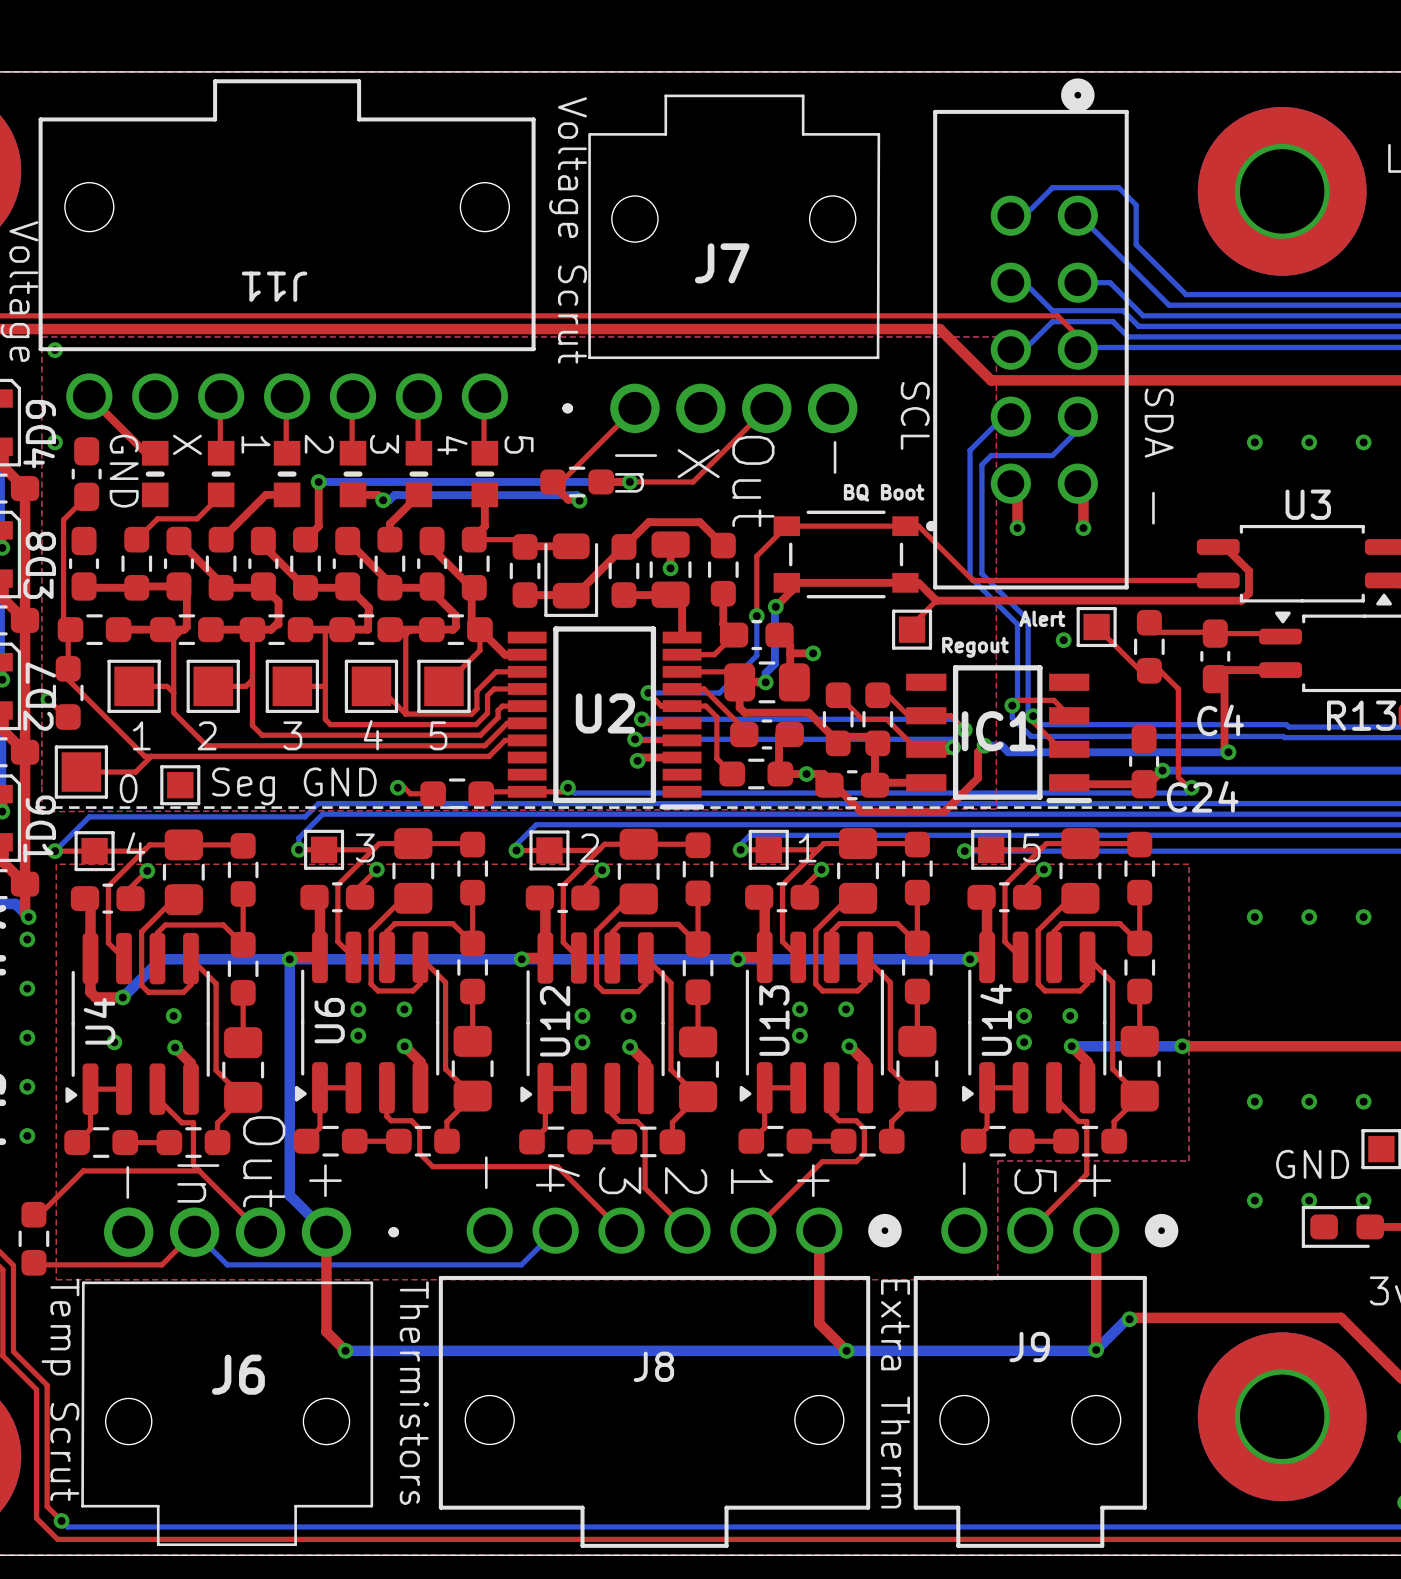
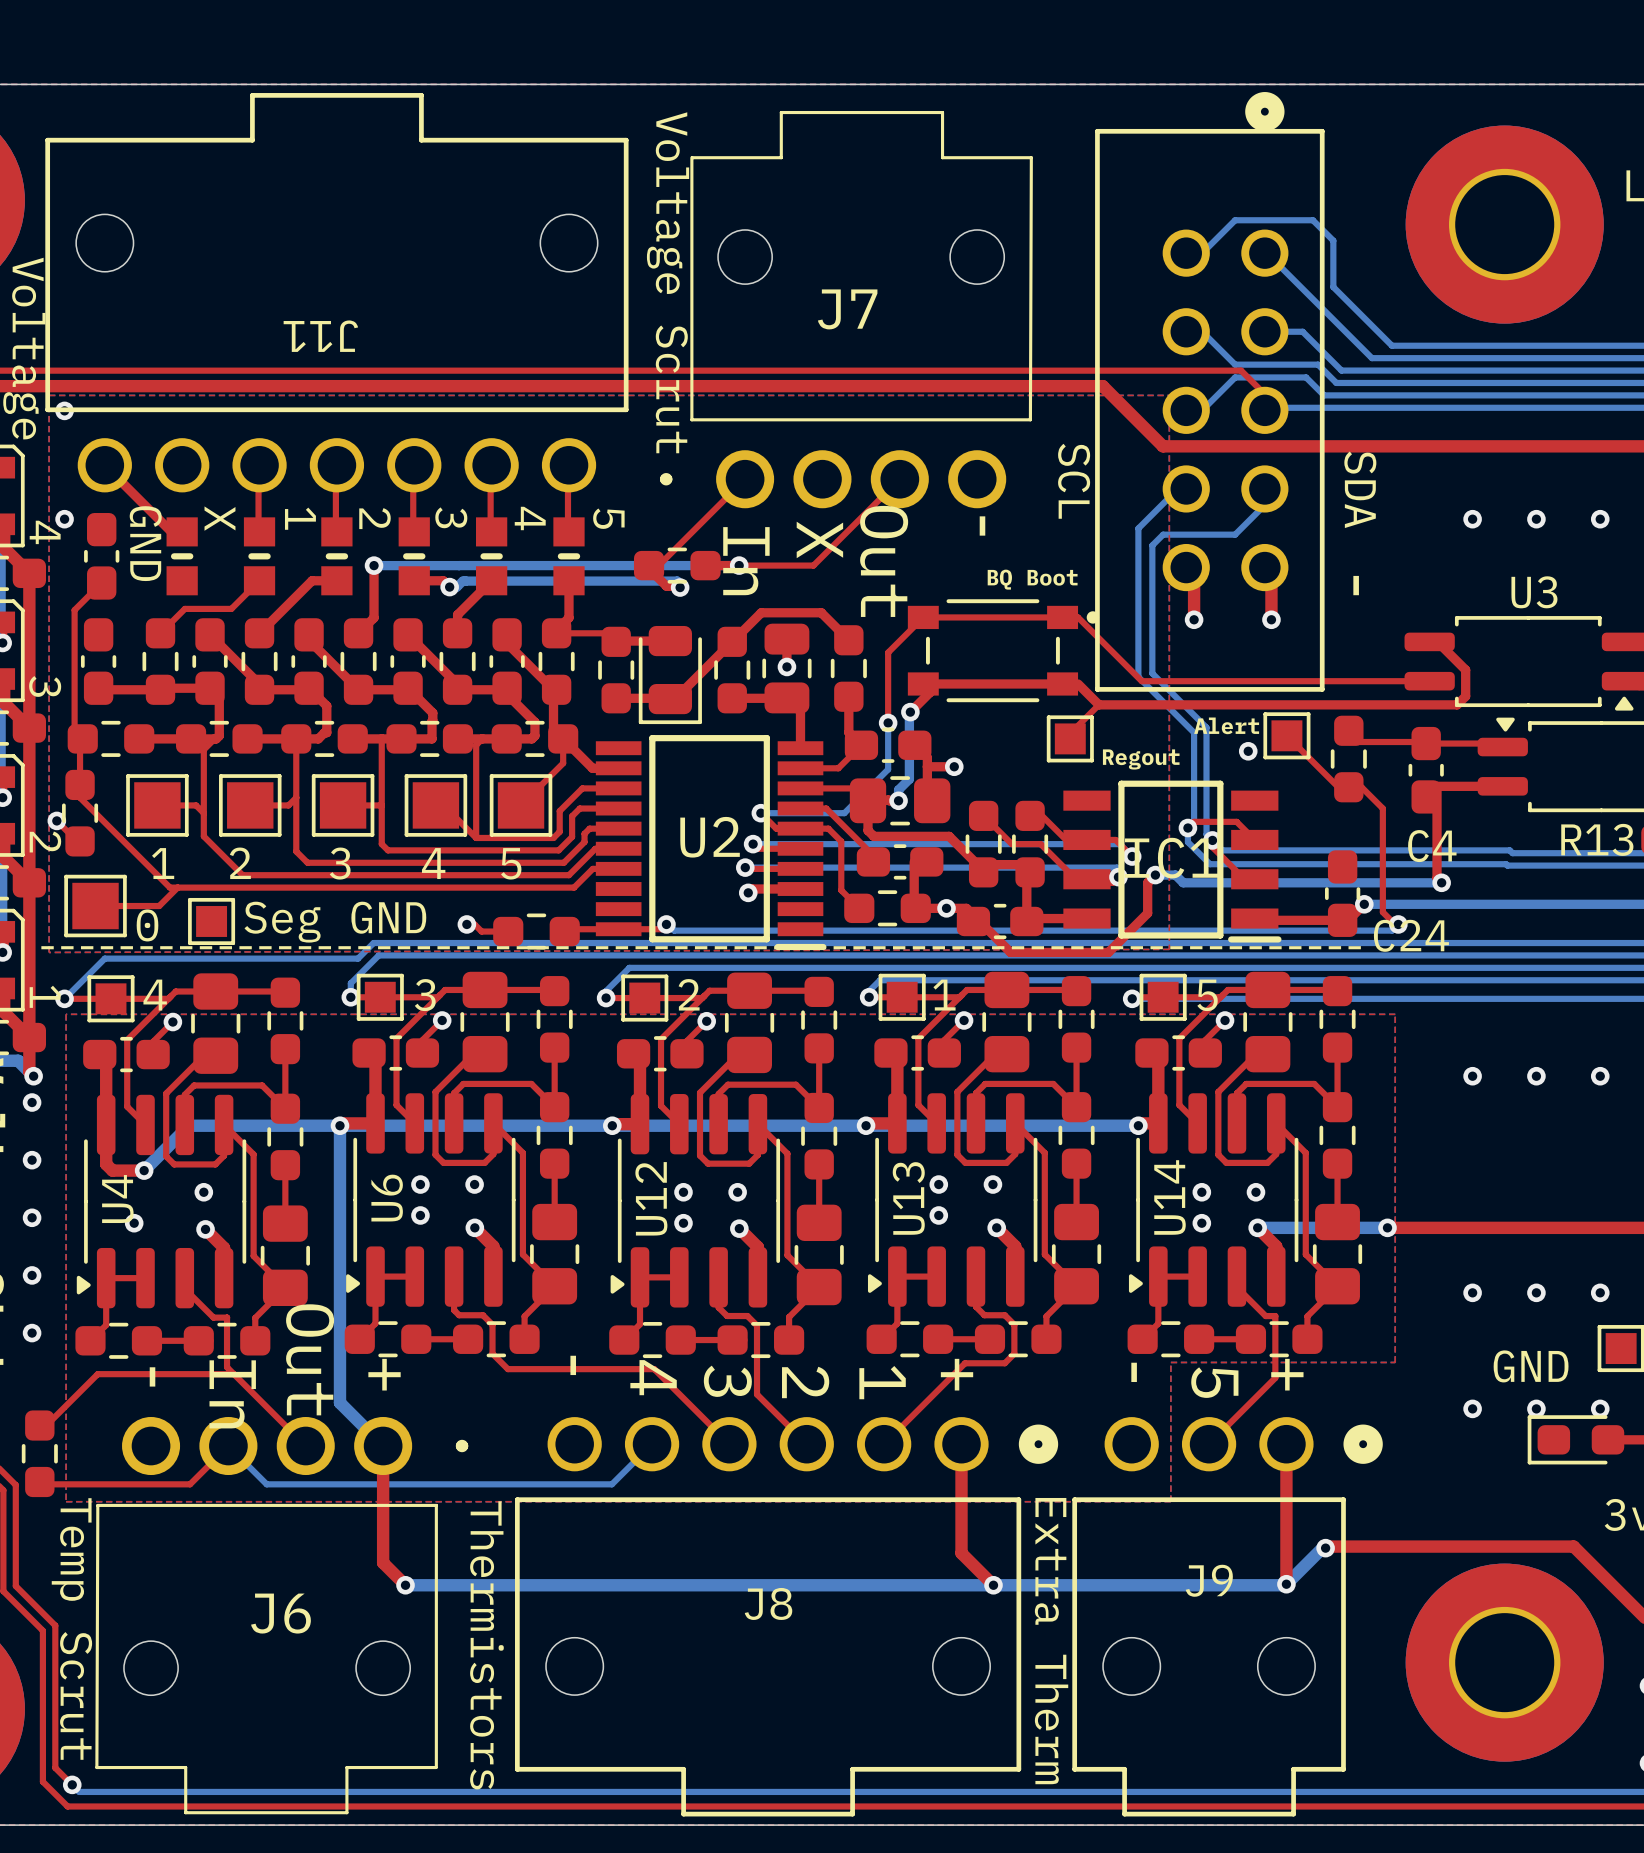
D9 name: D9 (40, 422) -> none
D8 name: D8 (40, 553) -> none
D7 name: D7 (40, 685) -> none
D6 name: D6 (40, 817) -> none

